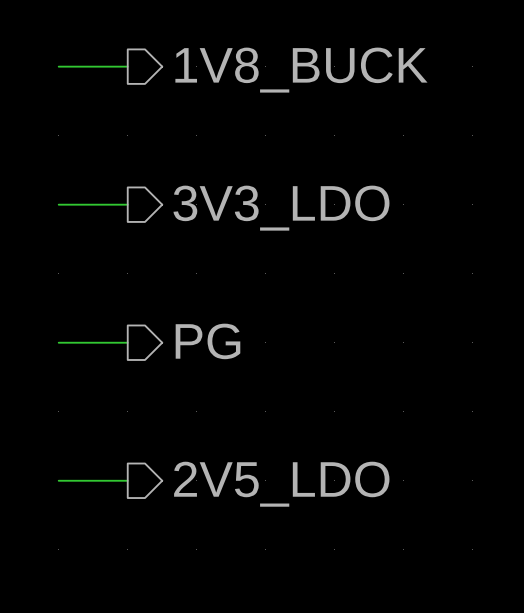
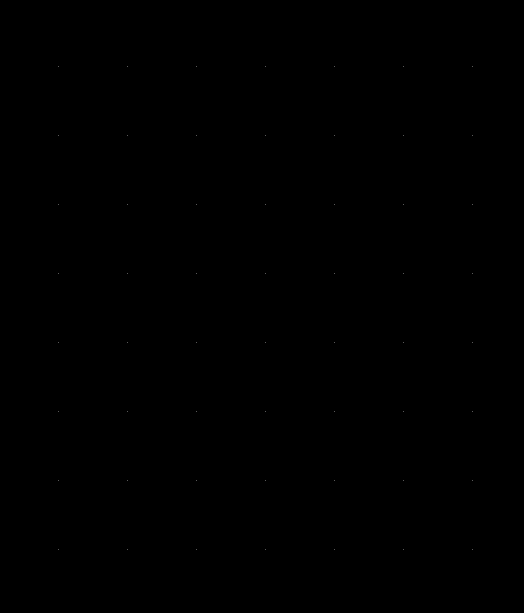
wire: (58, 66) (127, 66) -> none
hierarchical label: 1V8_BUCK (301, 70) -> none
wire: (58, 204) (127, 204) -> none
hierarchical label: 3V3_LDO (281, 208) -> none
hierarchical label: PG (207, 341) -> none
wire: (58, 342) (127, 342) -> none
wire: (58, 480) (127, 480) -> none
hierarchical label: 2V5_LDO (281, 484) -> none

